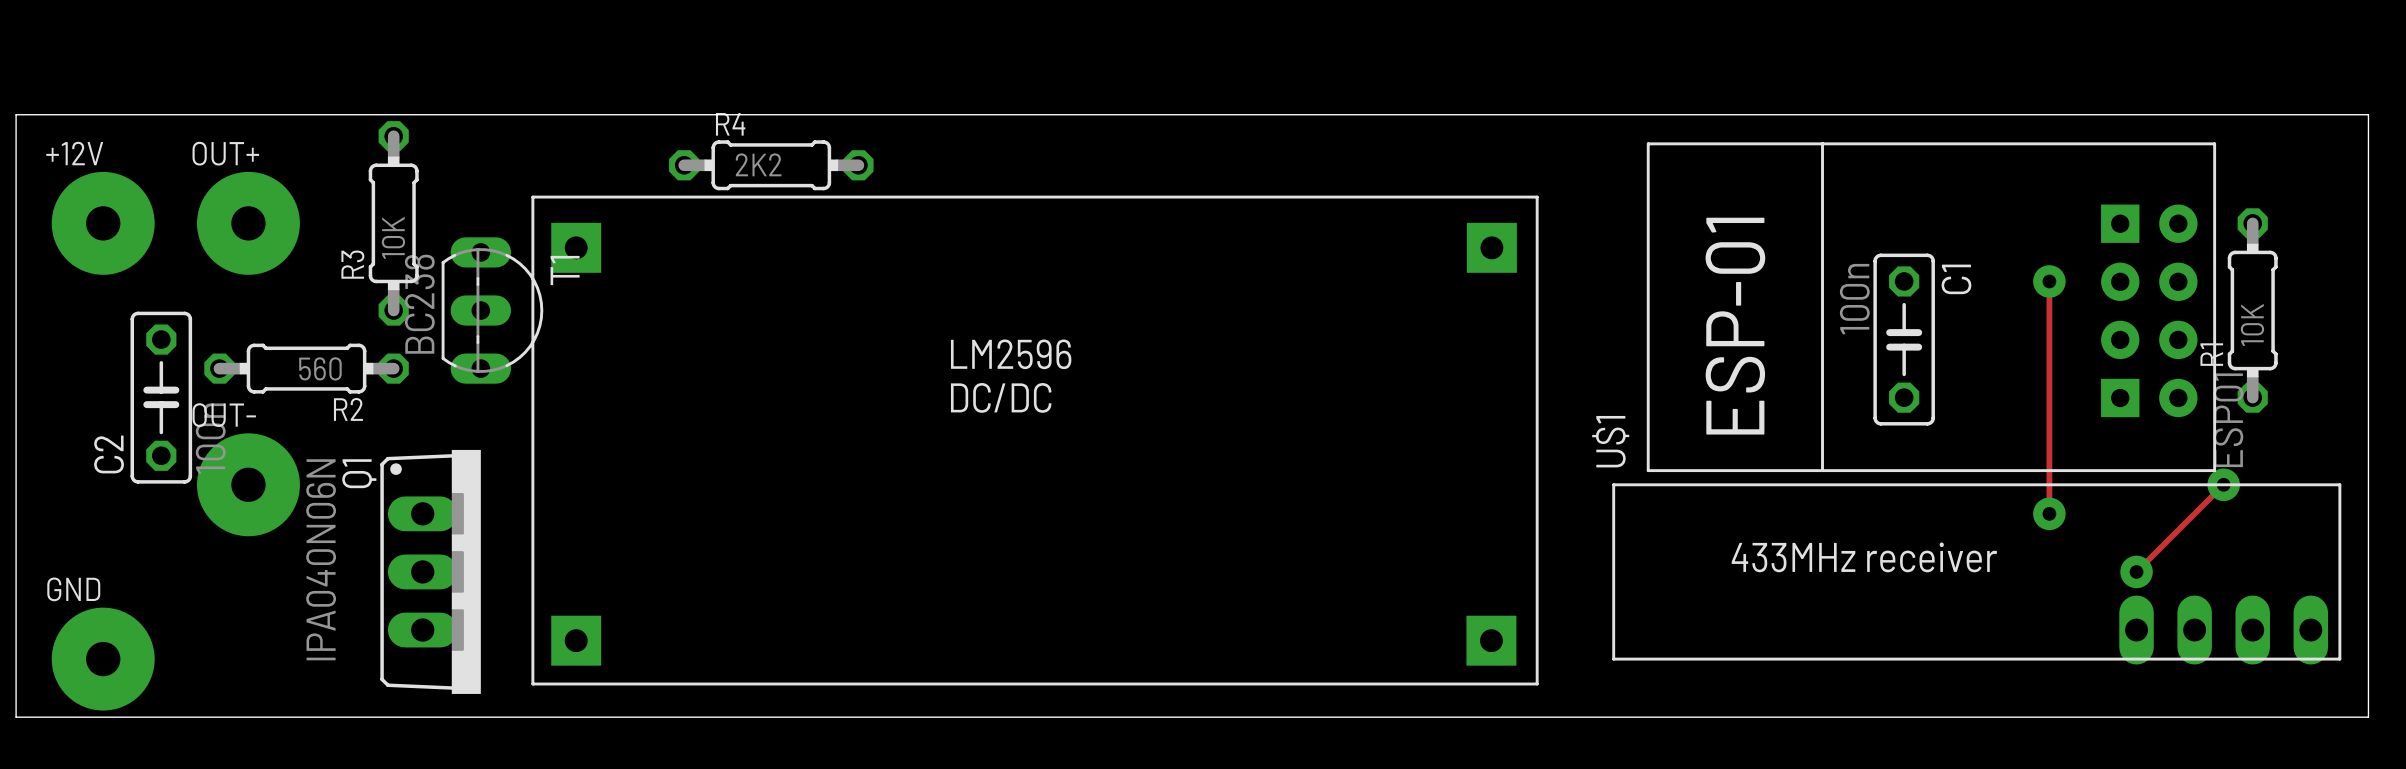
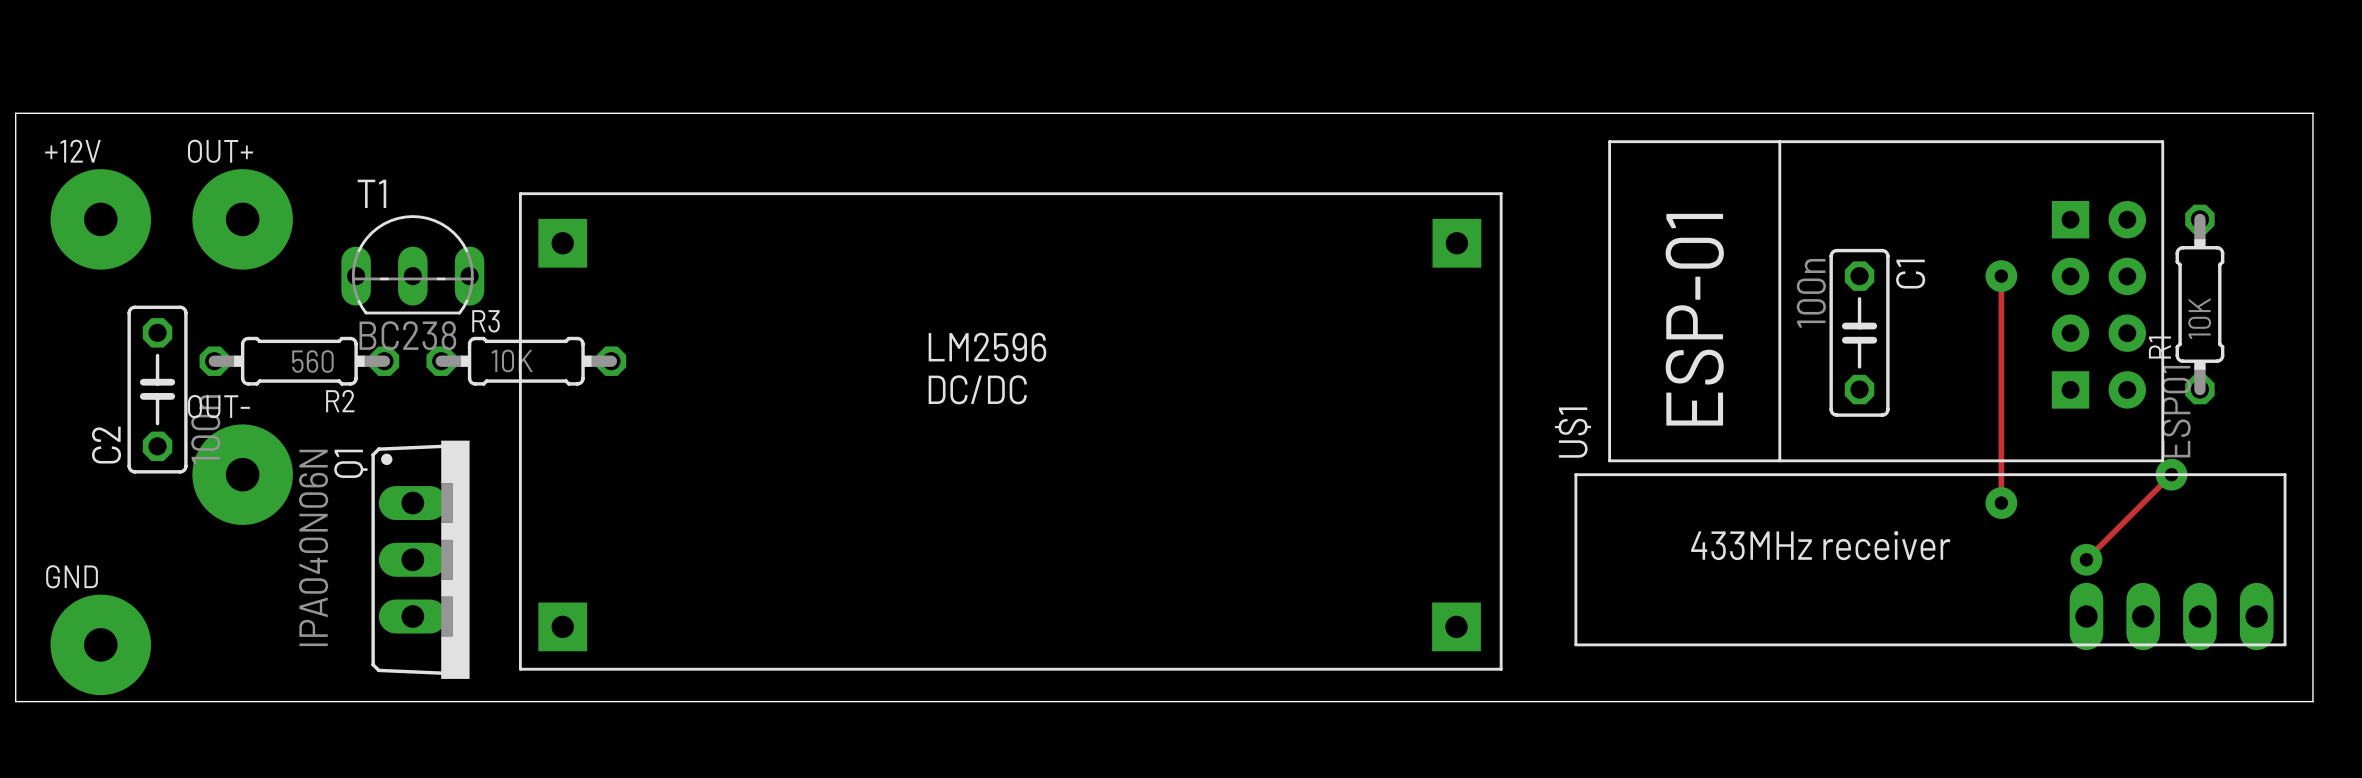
R4: 2K2 (771, 165) -> none
R3 rotation: 0° (393, 223) -> 90° clockwise (526, 361)
R3 position: (393, 223) -> (526, 361)
T1 rotation: 0° (492, 310) -> 90° counterclockwise (412, 264)

